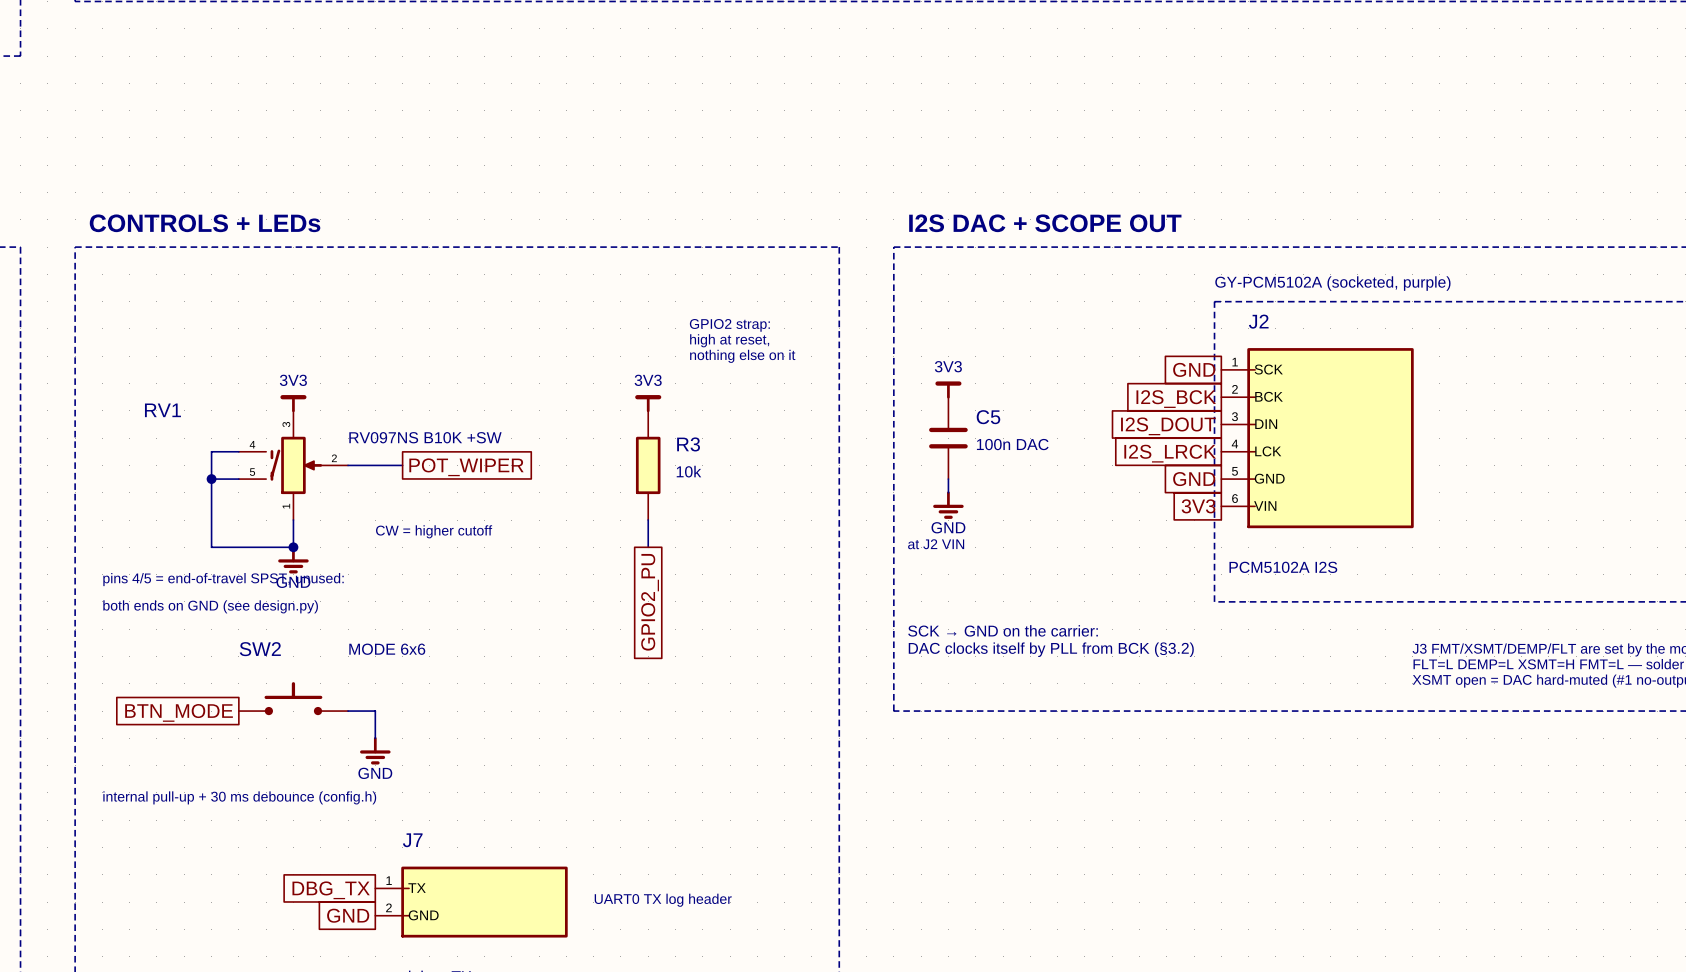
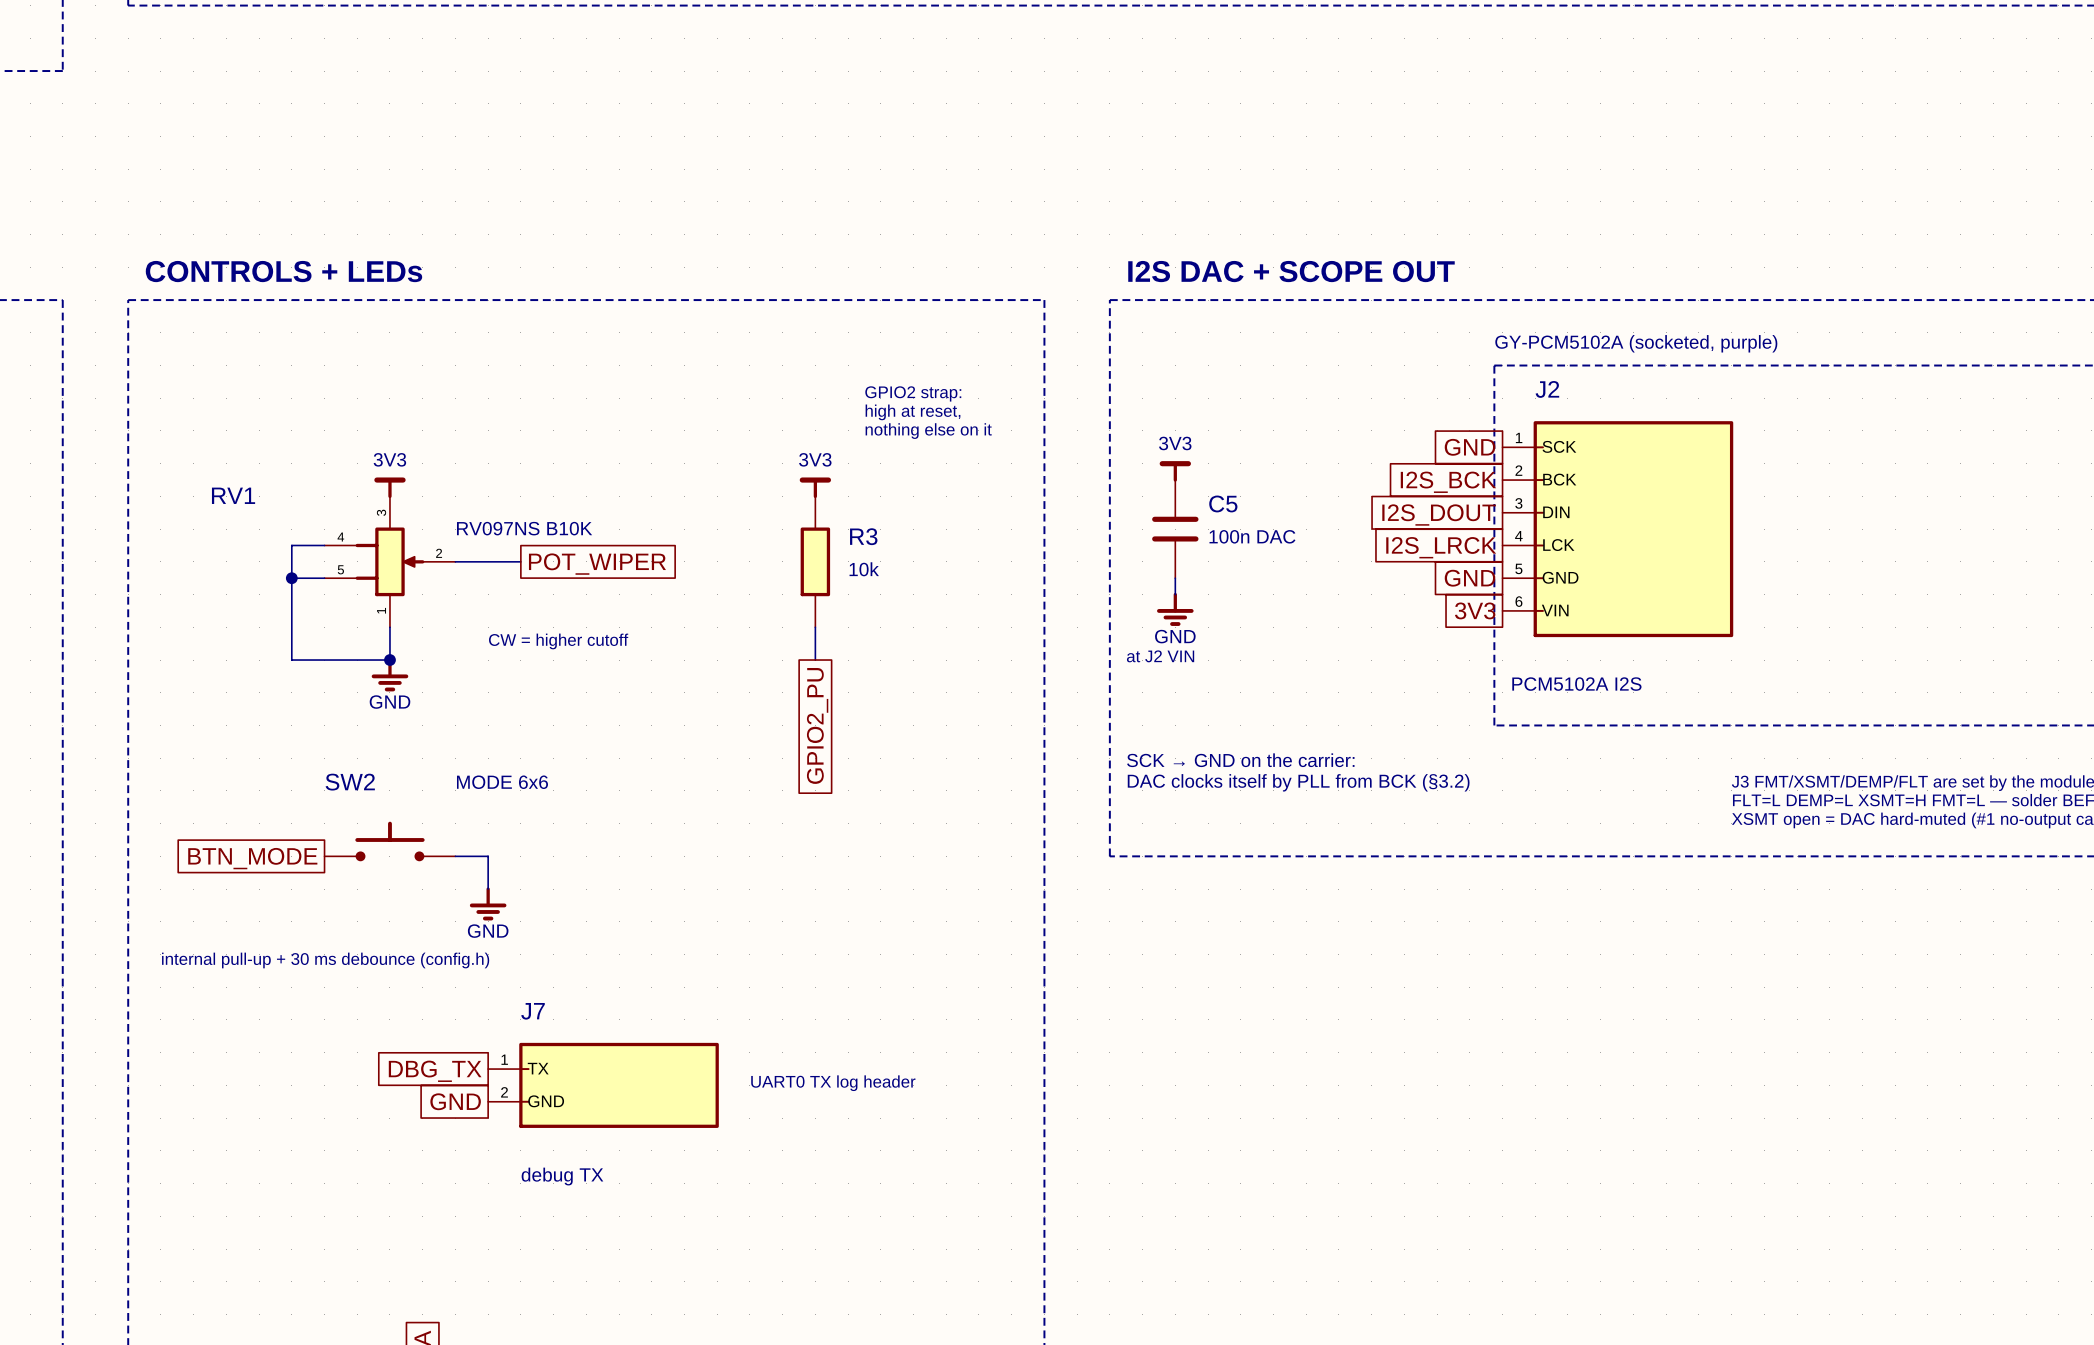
RV1 symbol: [238, 410, 349, 521] -> [324, 496, 456, 628]
RV1 value: RV097NS B10K +SW (425, 437) -> RV097NS B10K (524, 528)
text: pins 4/5 = end-of-travel SPST, unused: (223, 579) -> none
text: both ends on GND (see design.py) (210, 606) -> none

